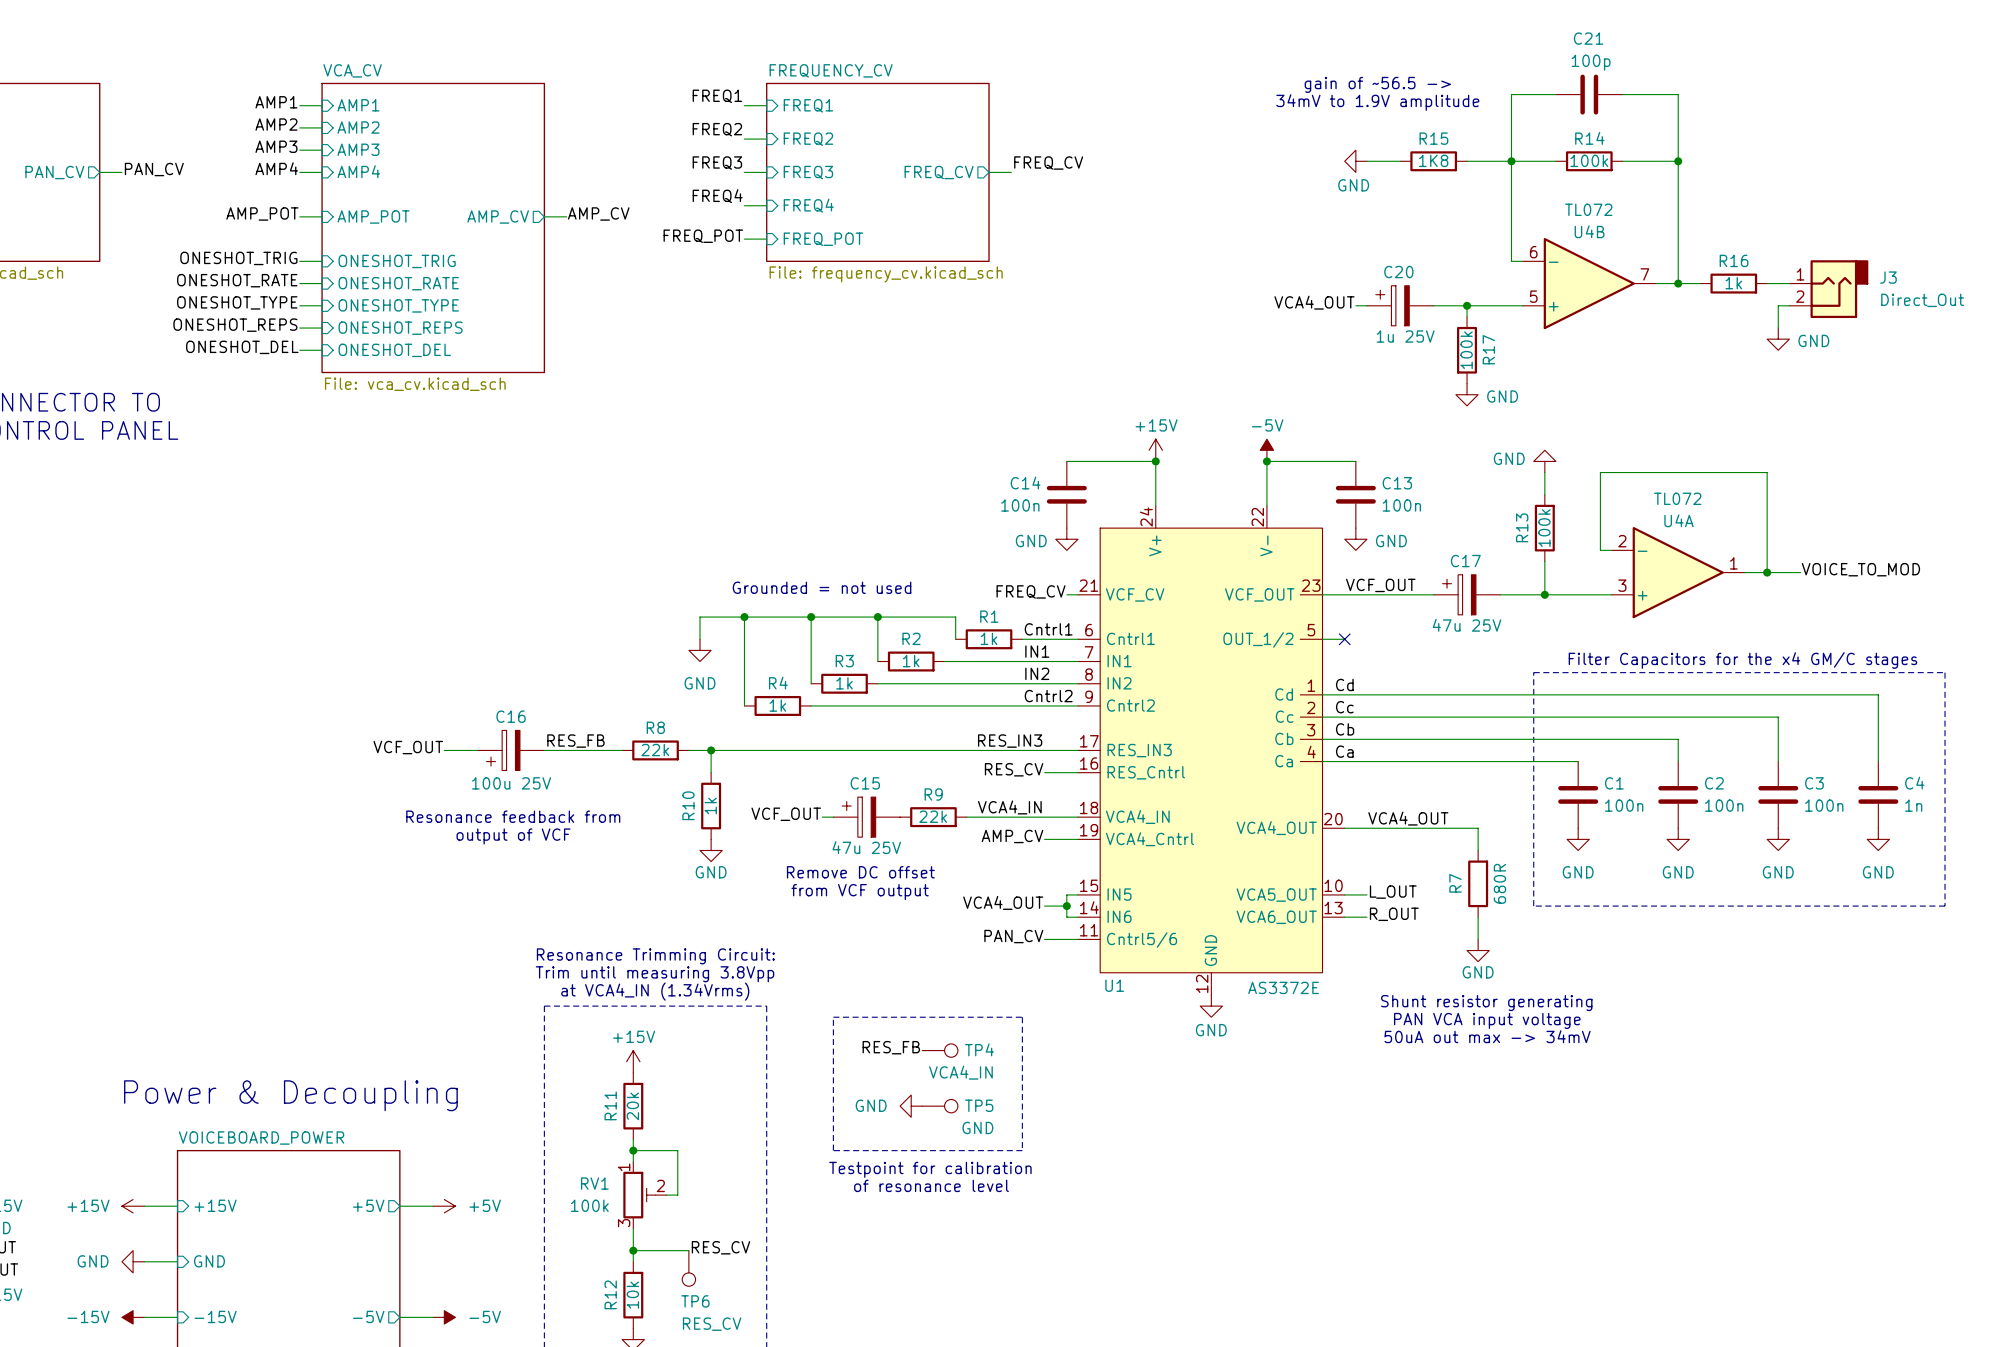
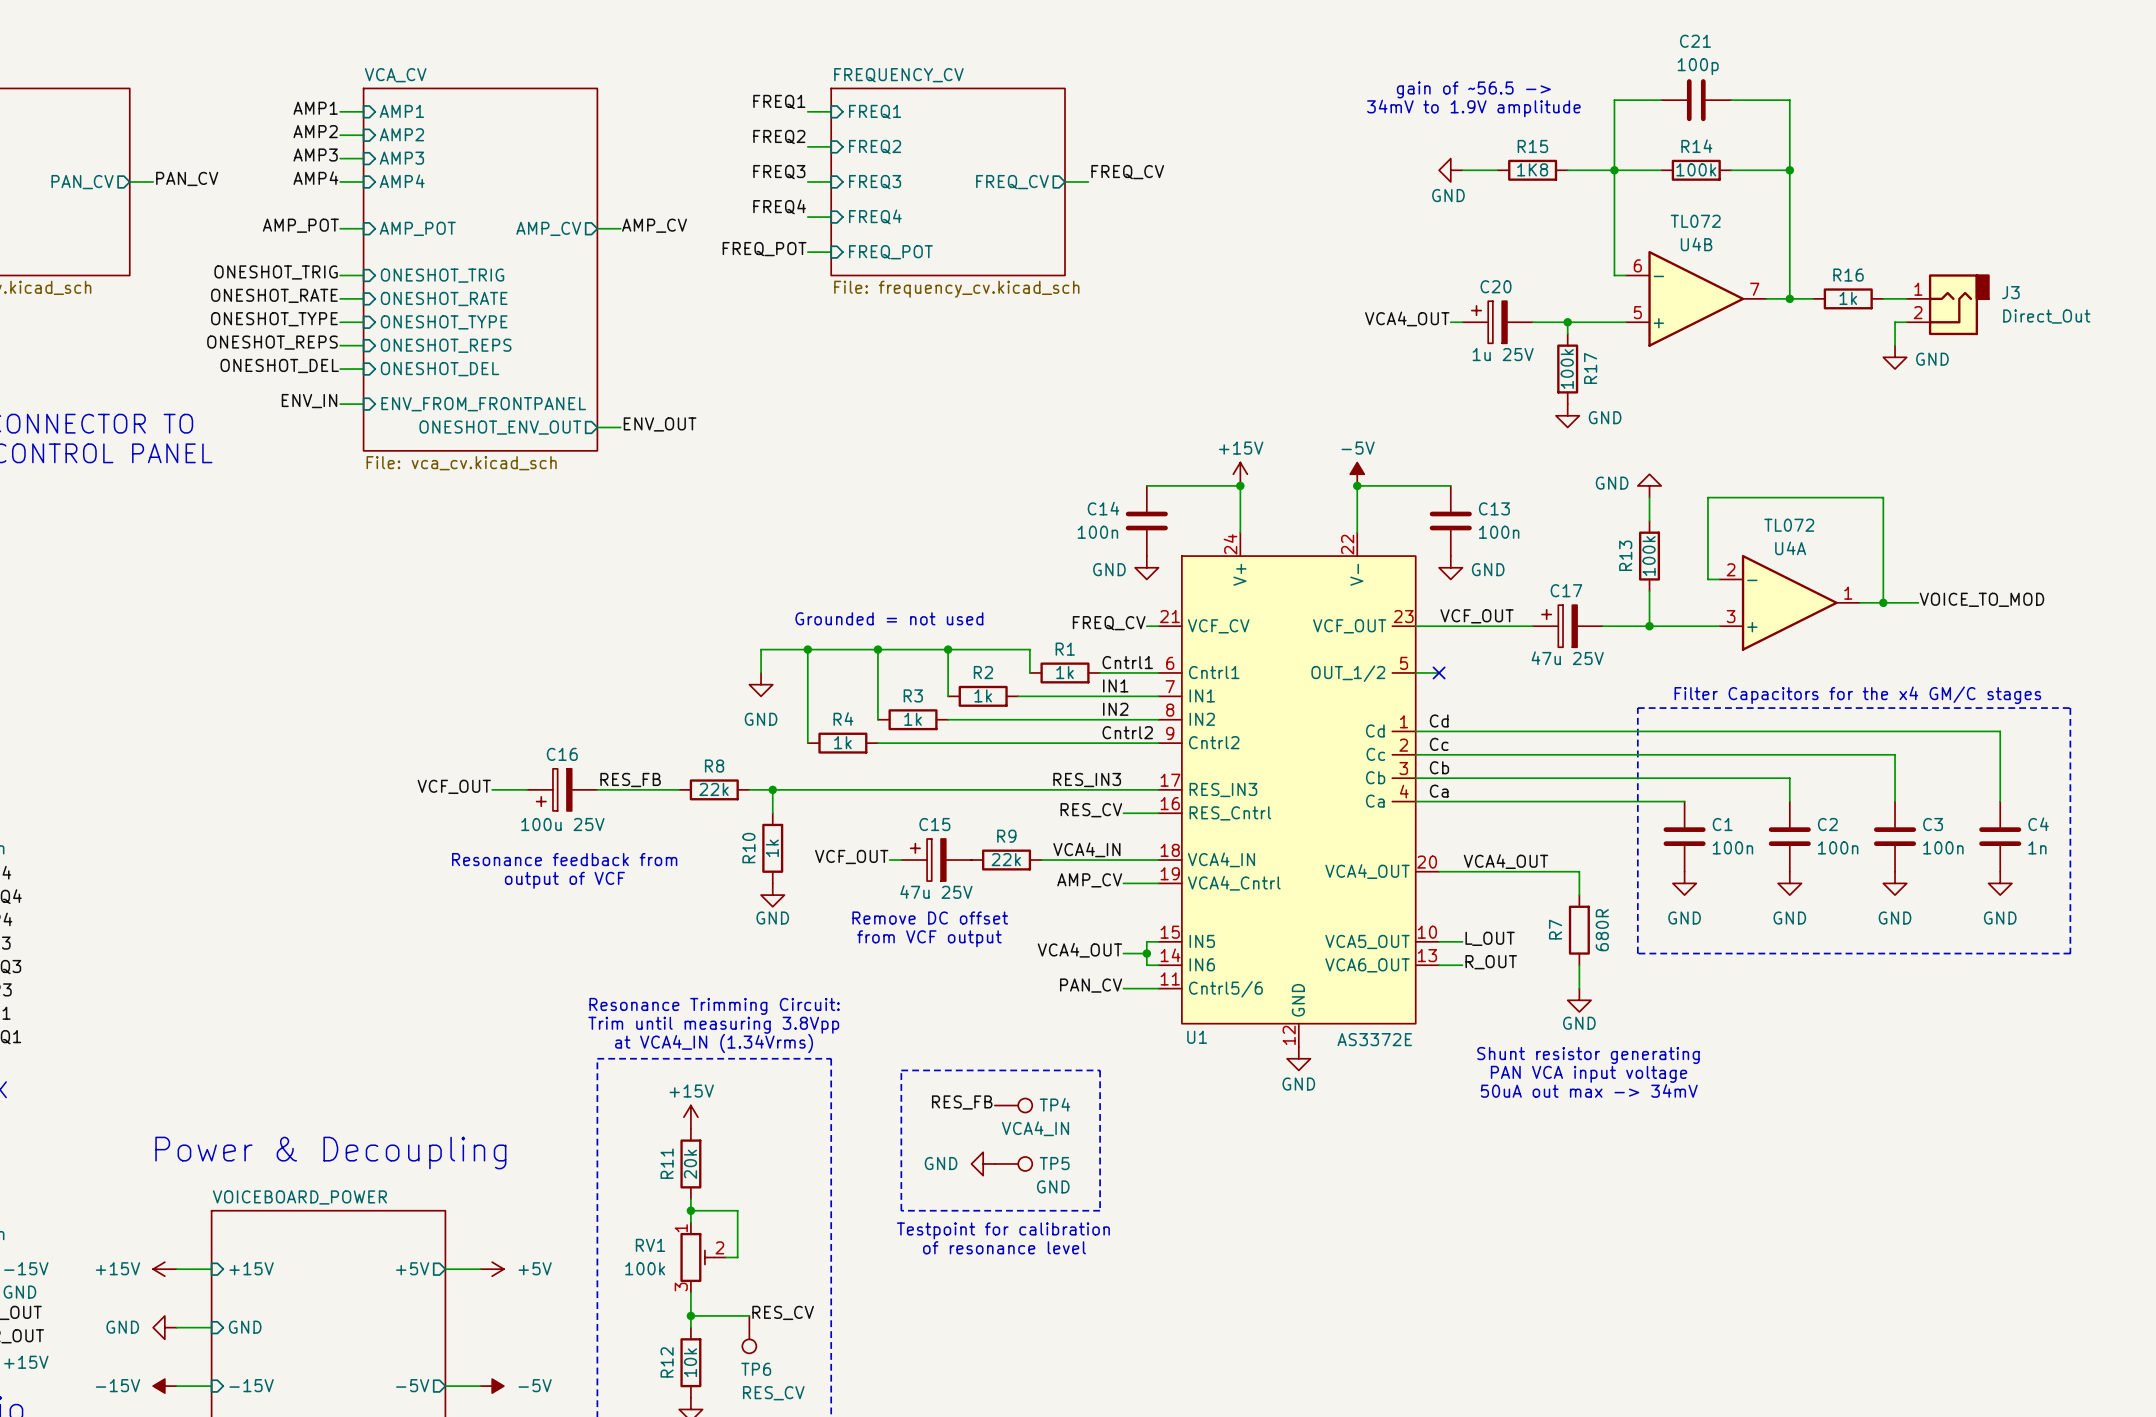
sheet VCA_CV: File: vca_cv.kicad_sch (433, 227) -> none
sheet VCA_CV: none -> File: vca_cv.kicad_sch (480, 269)
label: none -> ENV_IN (309, 401)
wire: none -> (340, 404) (363, 404)
sheet pin: none -> ENV_FROM_FRONTPANEL (483, 404)
label: none -> ENV_OUT (660, 424)
sheet pin: none -> ONESHOT_ENV_OUT (500, 427)
wire: none -> (597, 427) (620, 427)

